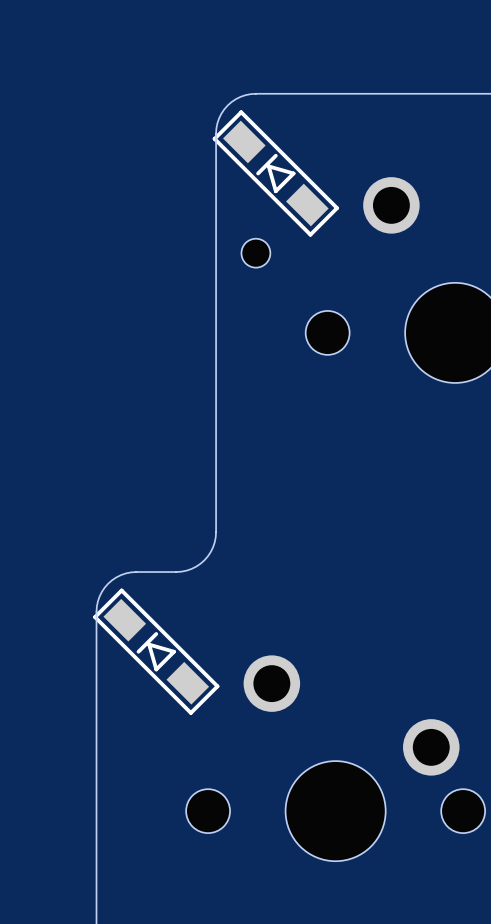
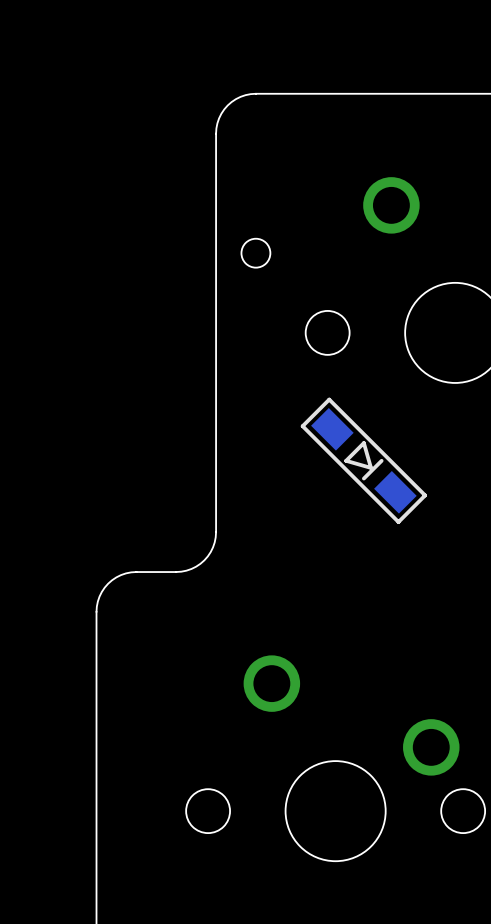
part: (275, 173) -> none
part: none -> (363, 460)
part: (156, 651) -> none

